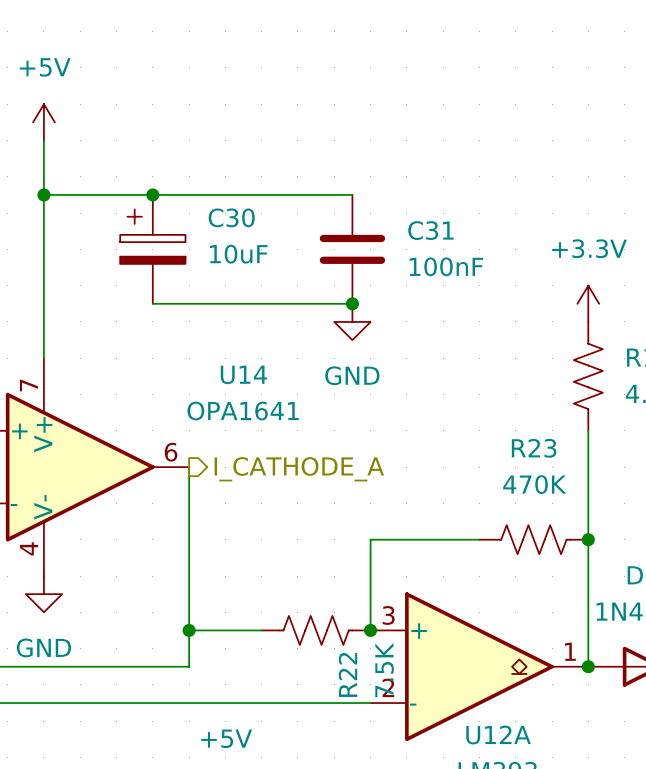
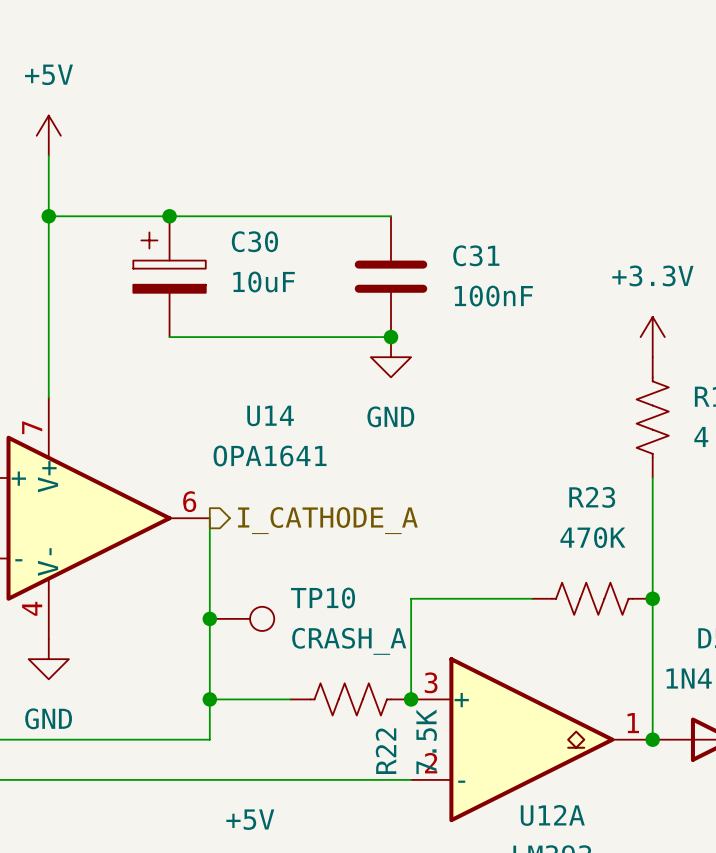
junction: none -> (209, 618)
TP10: none -> CRASH_A (242, 618)

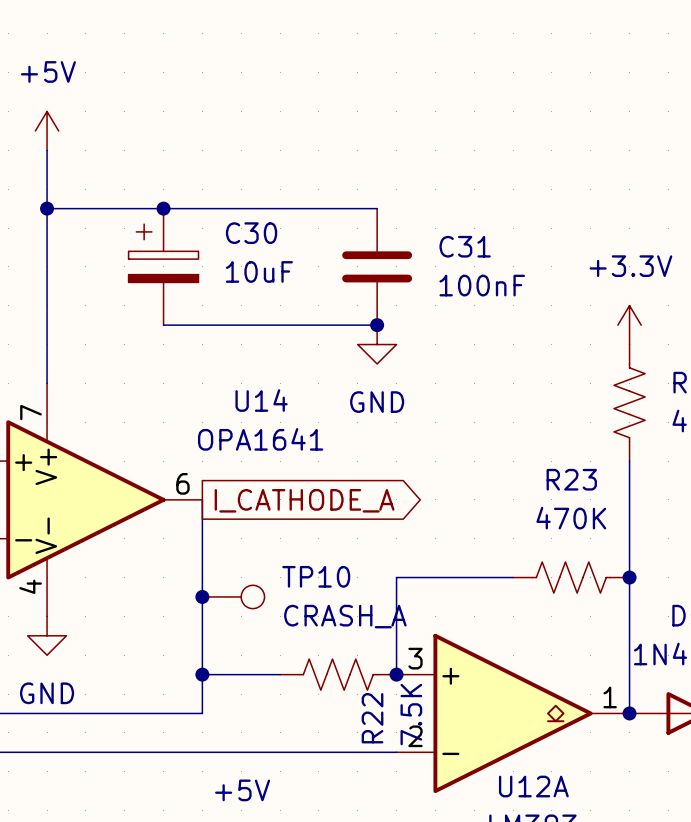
hierarchical label: I_CATHODE_A (327, 520) -> none
global label: none -> I_CATHODE_A (304, 500)

